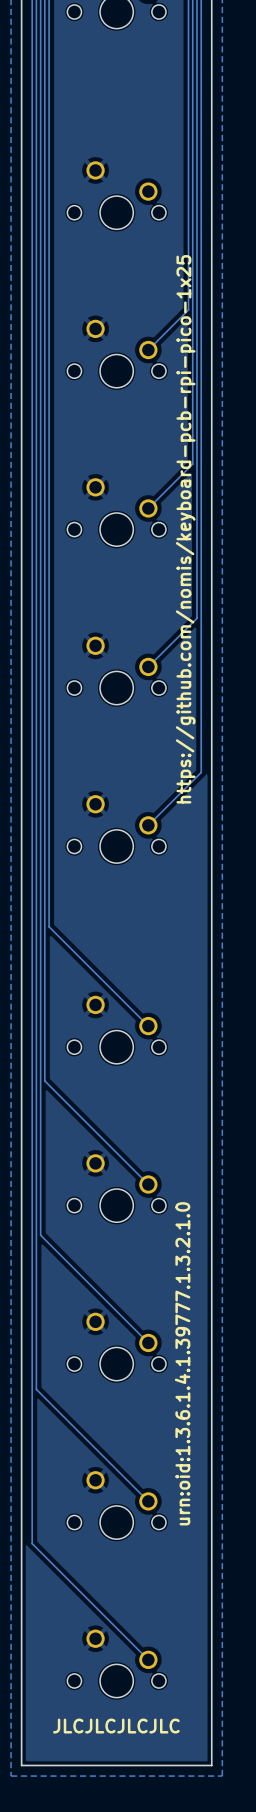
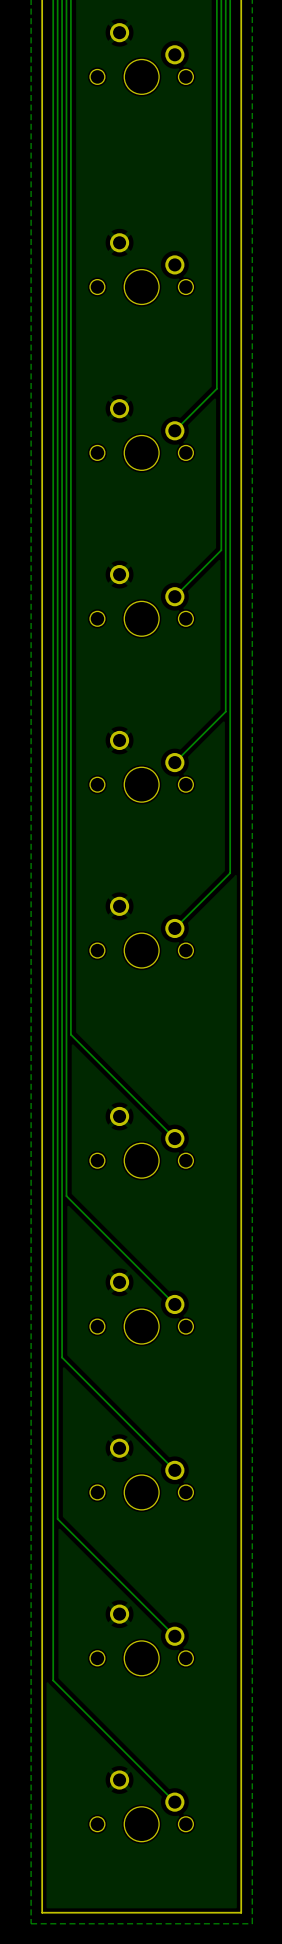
text: https://github.com/nomis/keyboard-pcb-rpi-pico-1x25 (185, 529) -> none
text: urn:oid:1.3.6.1.4.1.39777.1.3.2.1.0 (182, 1363) -> none
text: JLCJLCJLCJLC (116, 1726) -> none

